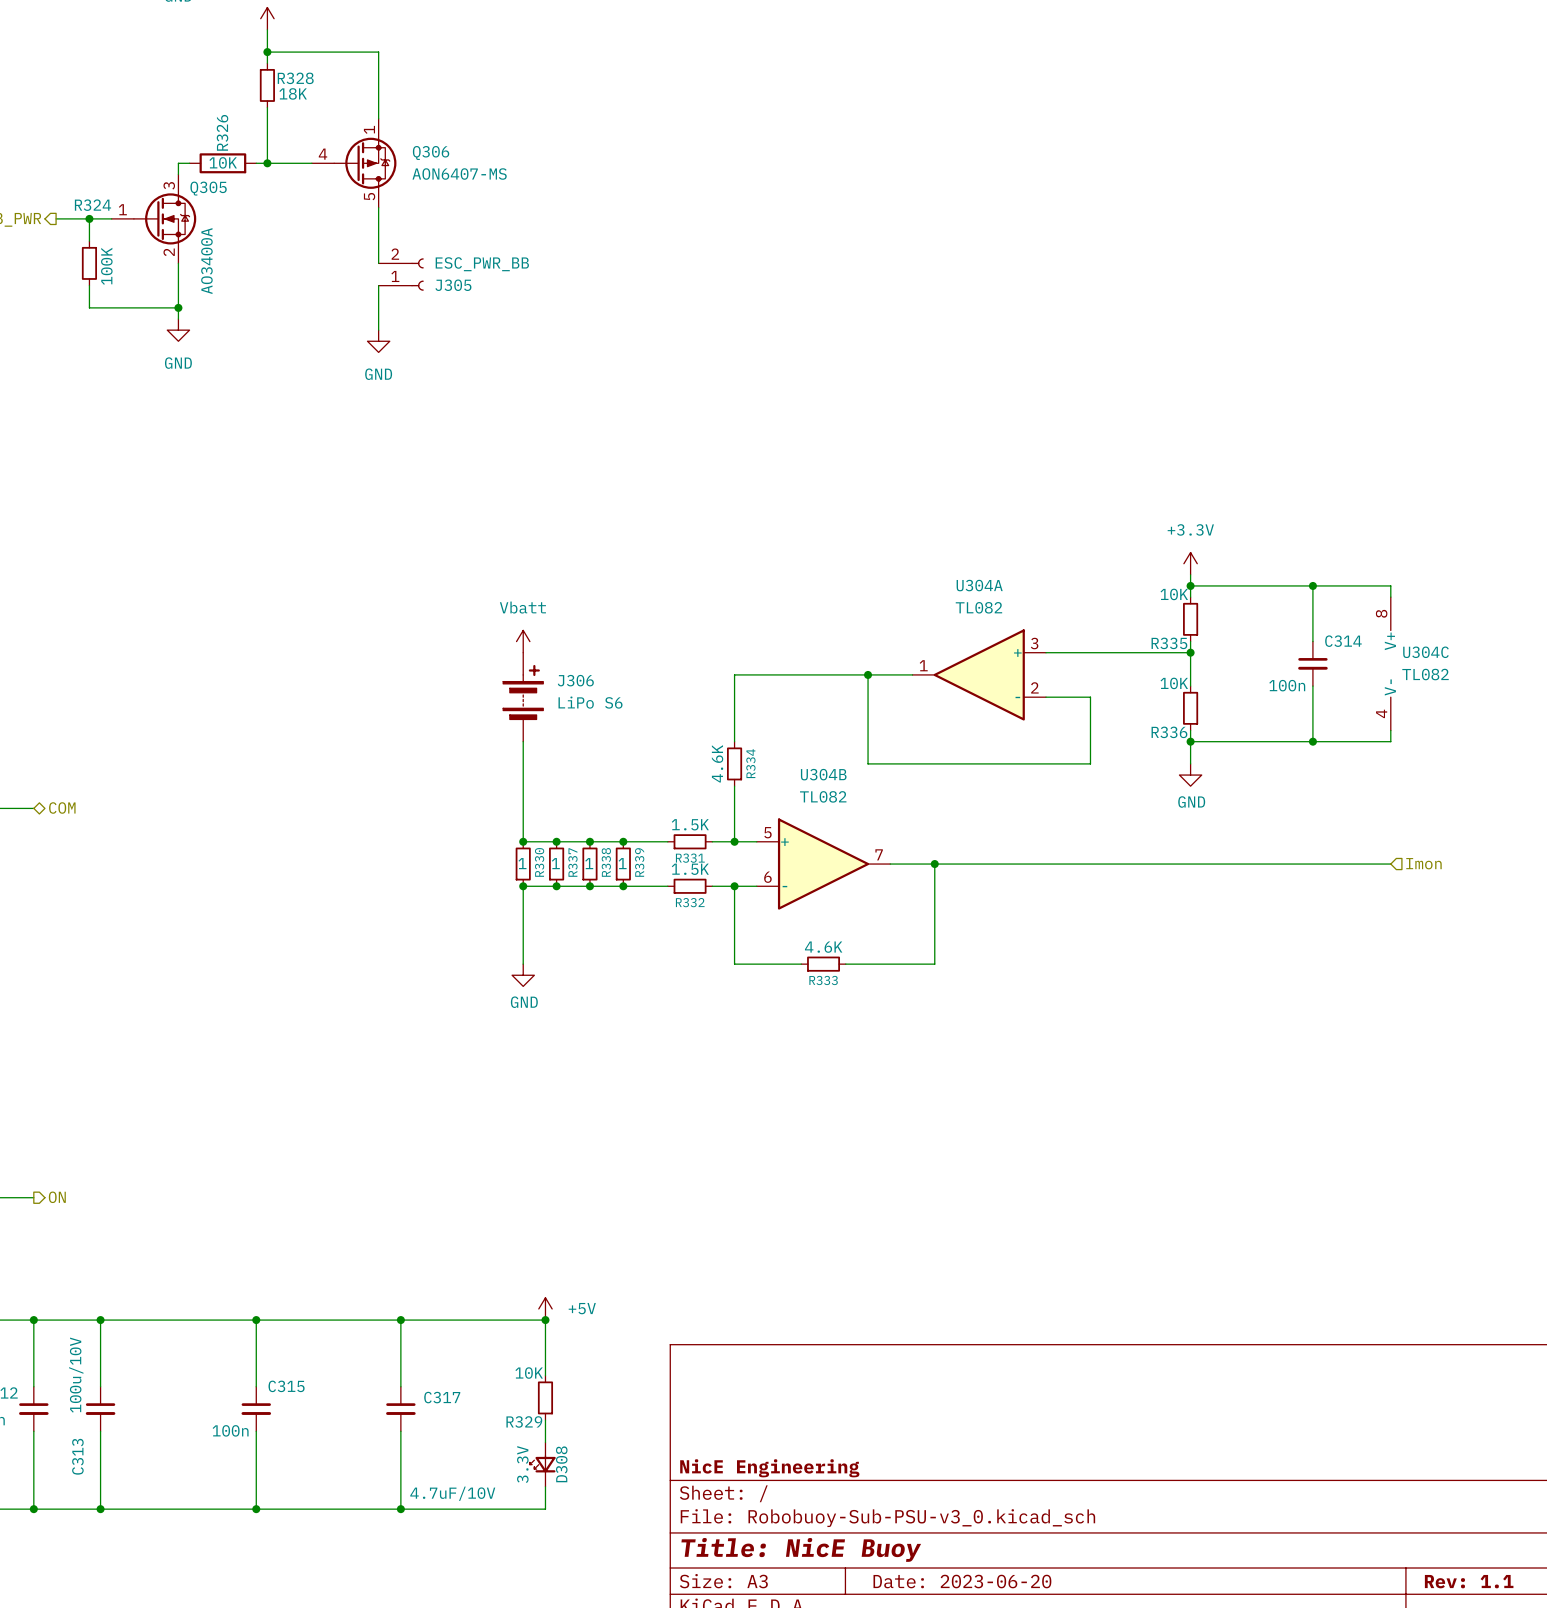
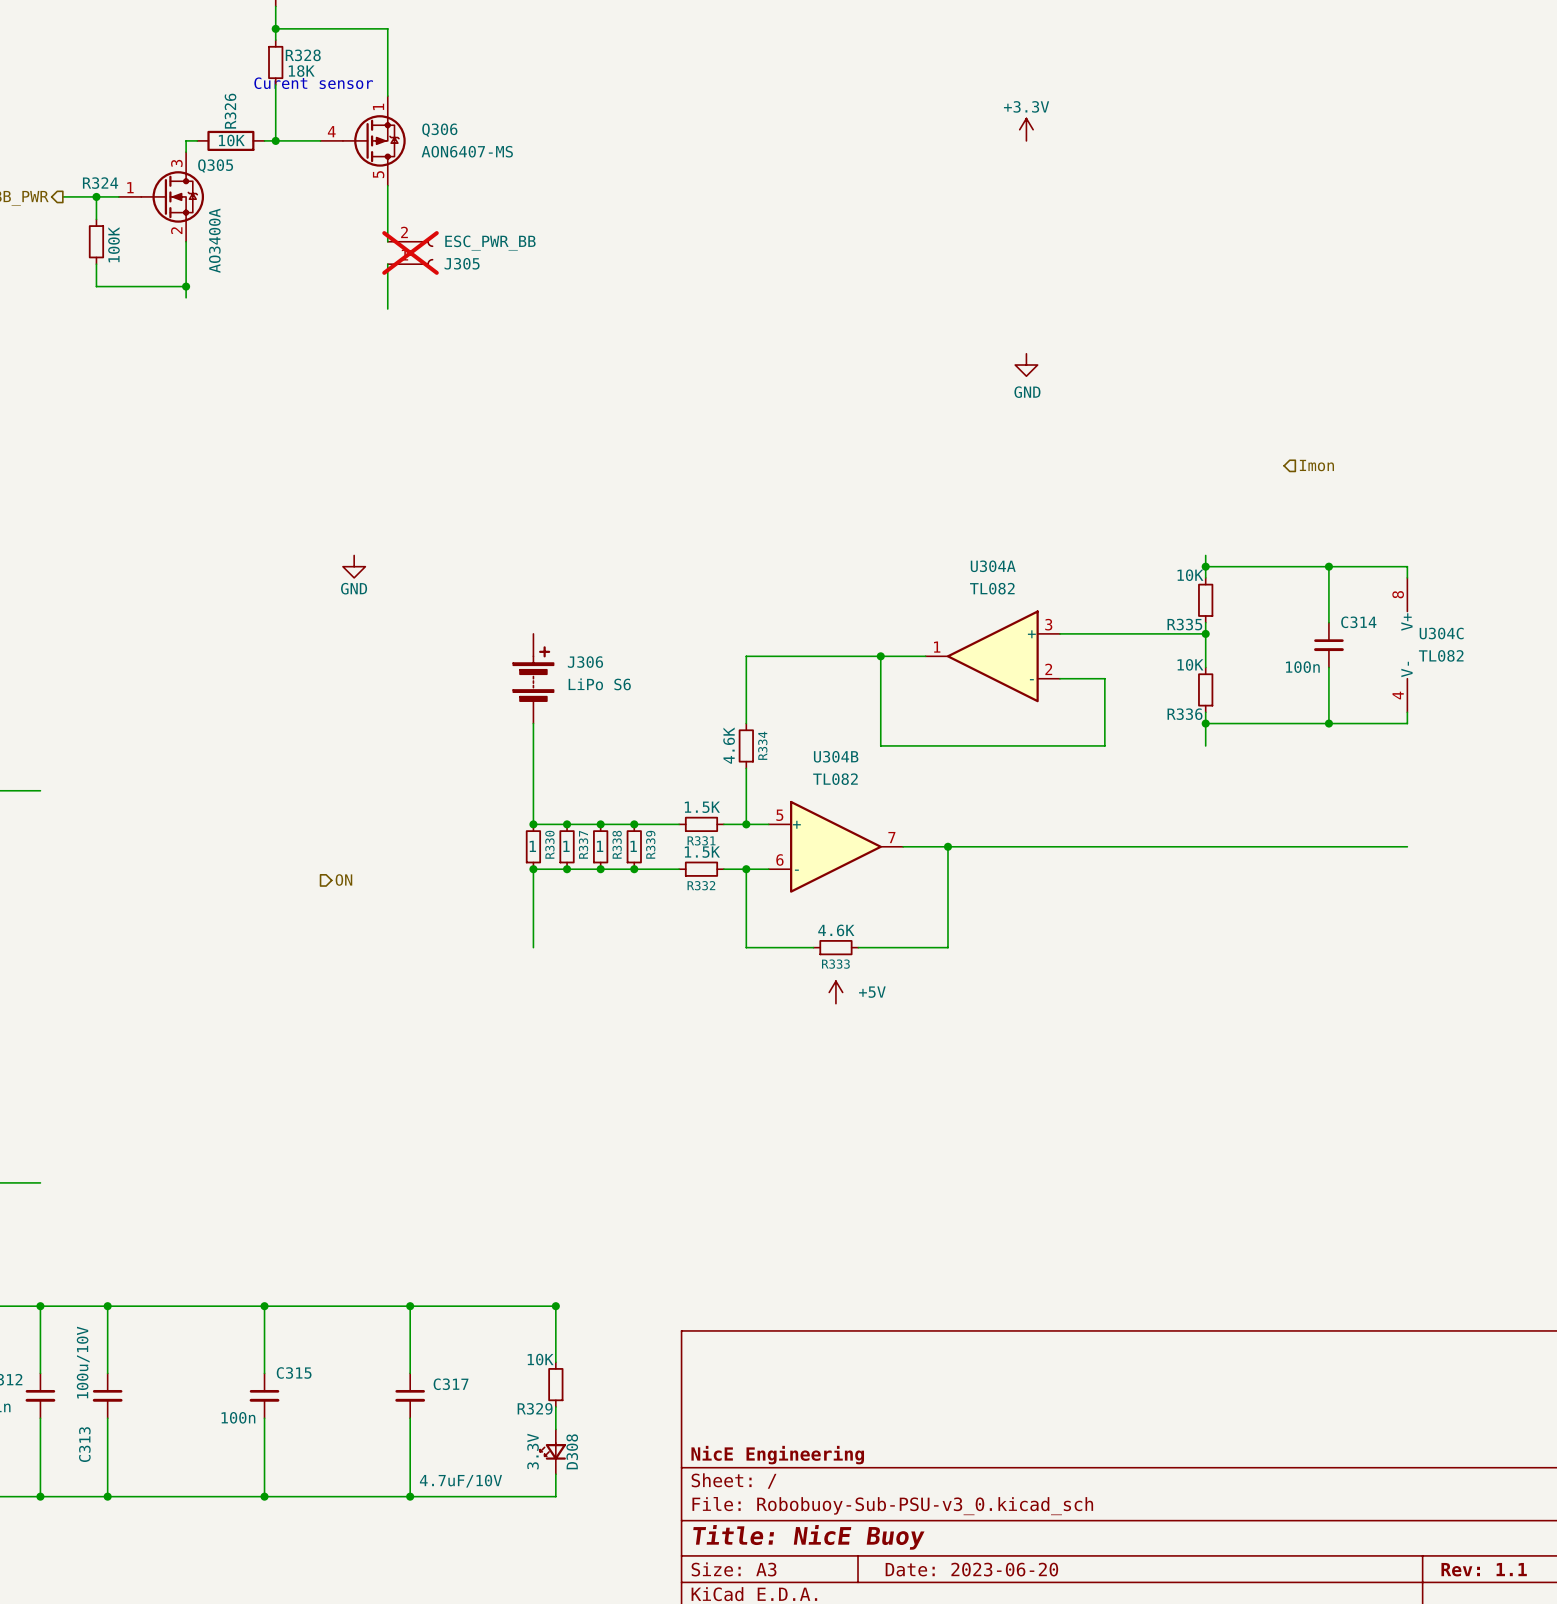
text: none -> Curent sensor (313, 83)
power symbol: none -> +3.3V (1026, 129)
J305 do-not-place cross: none -> (410, 252)
power symbol: GND (178, 330) -> none
power symbol: GND (378, 341) -> none
power symbol: none -> GND (1026, 365)
hierarchical label: none -> Imon (1316, 465)
power symbol: +3.3V (1190, 563) -> none
power symbol: none -> GND (354, 566)
power symbol: Vbatt (523, 641) -> none
power symbol: GND (1190, 775) -> none
hierarchical label: COM (62, 808) -> none
hierarchical label: Imon (1423, 863) -> none
hierarchical label: none -> ON (343, 880)
power symbol: GND (523, 975) -> none
power symbol: none -> +5V (835, 992)
hierarchical label: ON (57, 1197) -> none
power symbol: +5V (545, 1308) -> none

